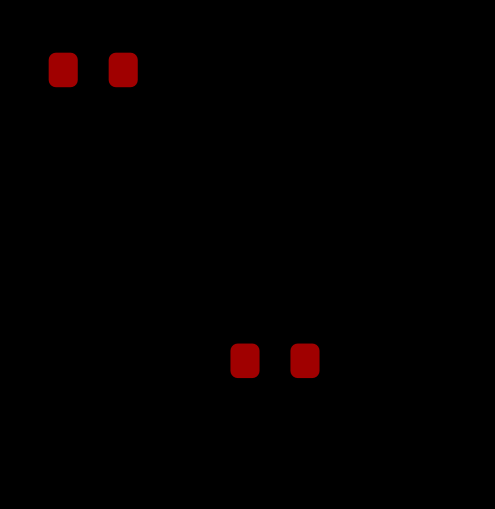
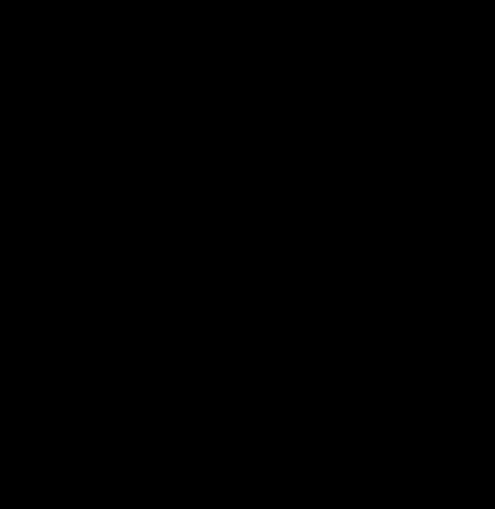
part: (93, 69) -> none
part: (274, 360) -> none

